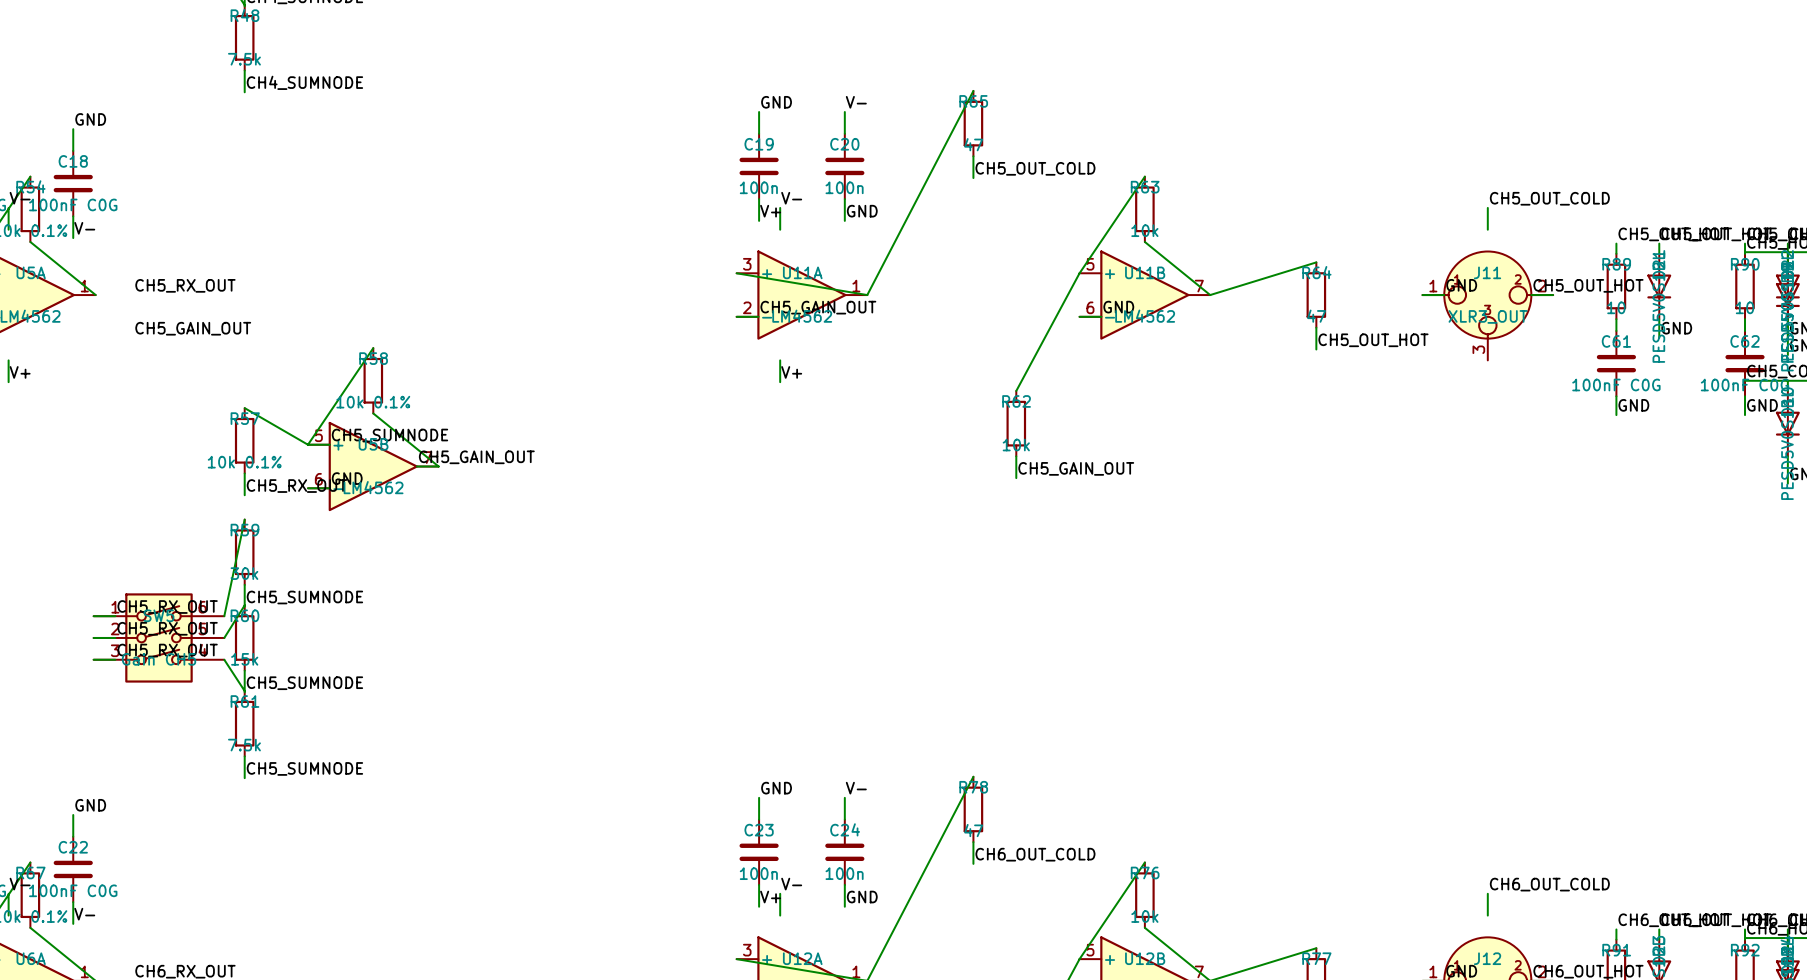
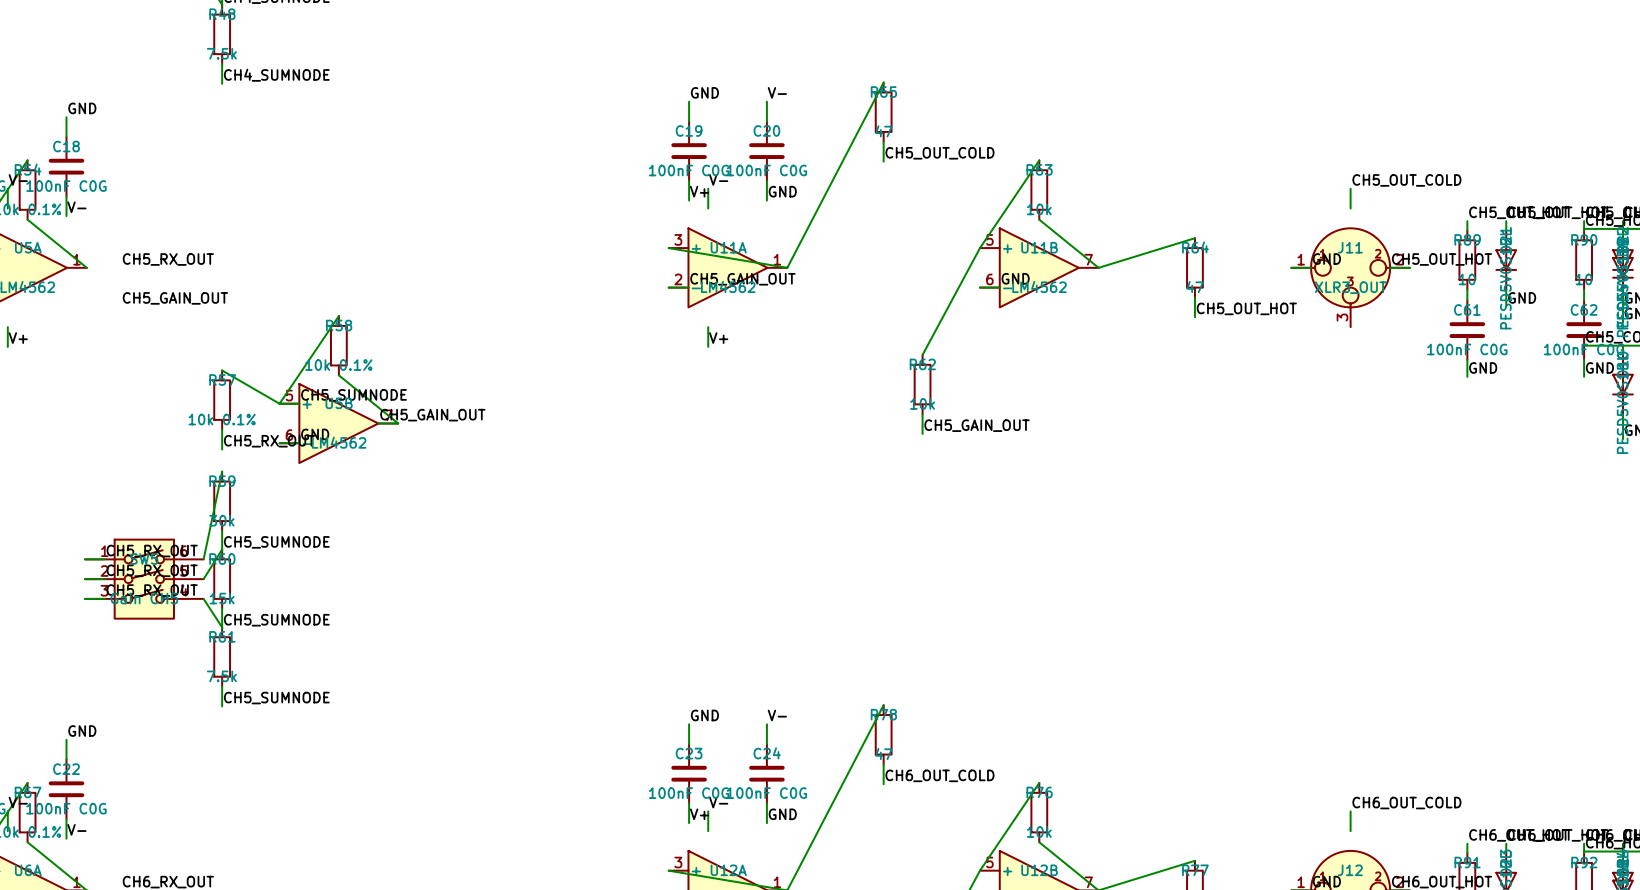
C19 value: 100n (758, 187) -> 100nF C0G (689, 170)
C20 value: 100n (844, 187) -> 100nF C0G (766, 170)
C23 value: 100n (758, 873) -> 100nF C0G (689, 793)
C24 value: 100n (844, 873) -> 100nF C0G (766, 793)

